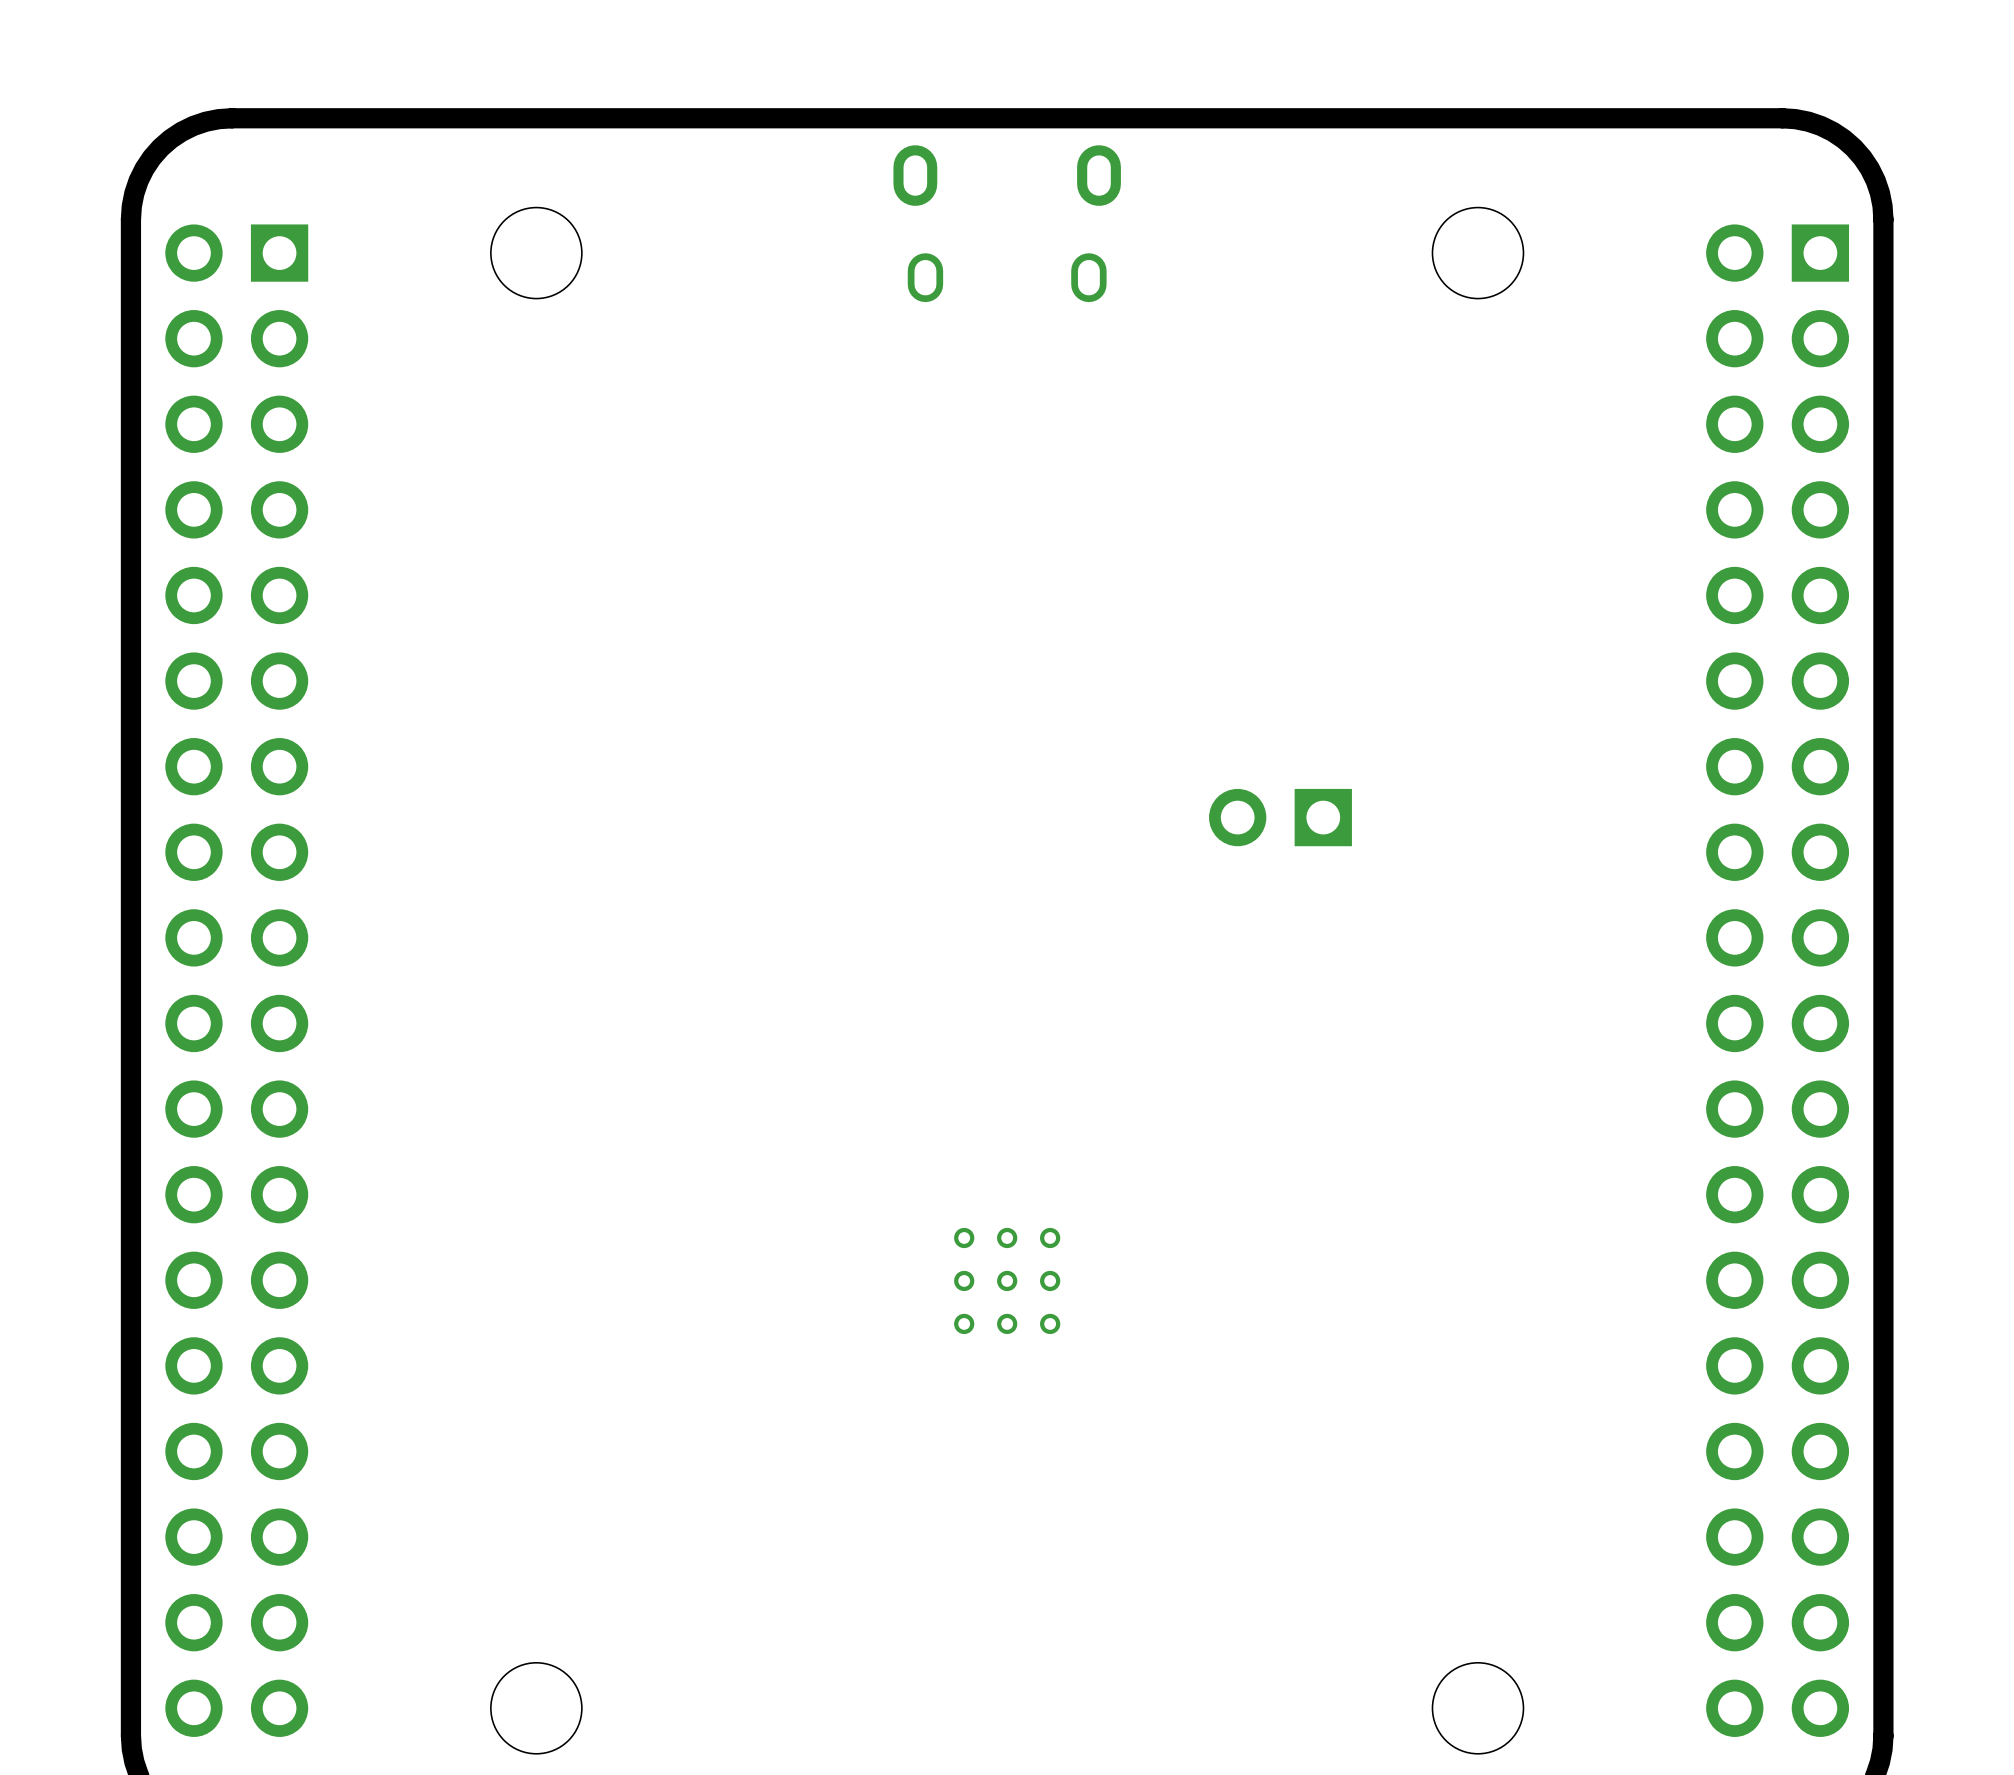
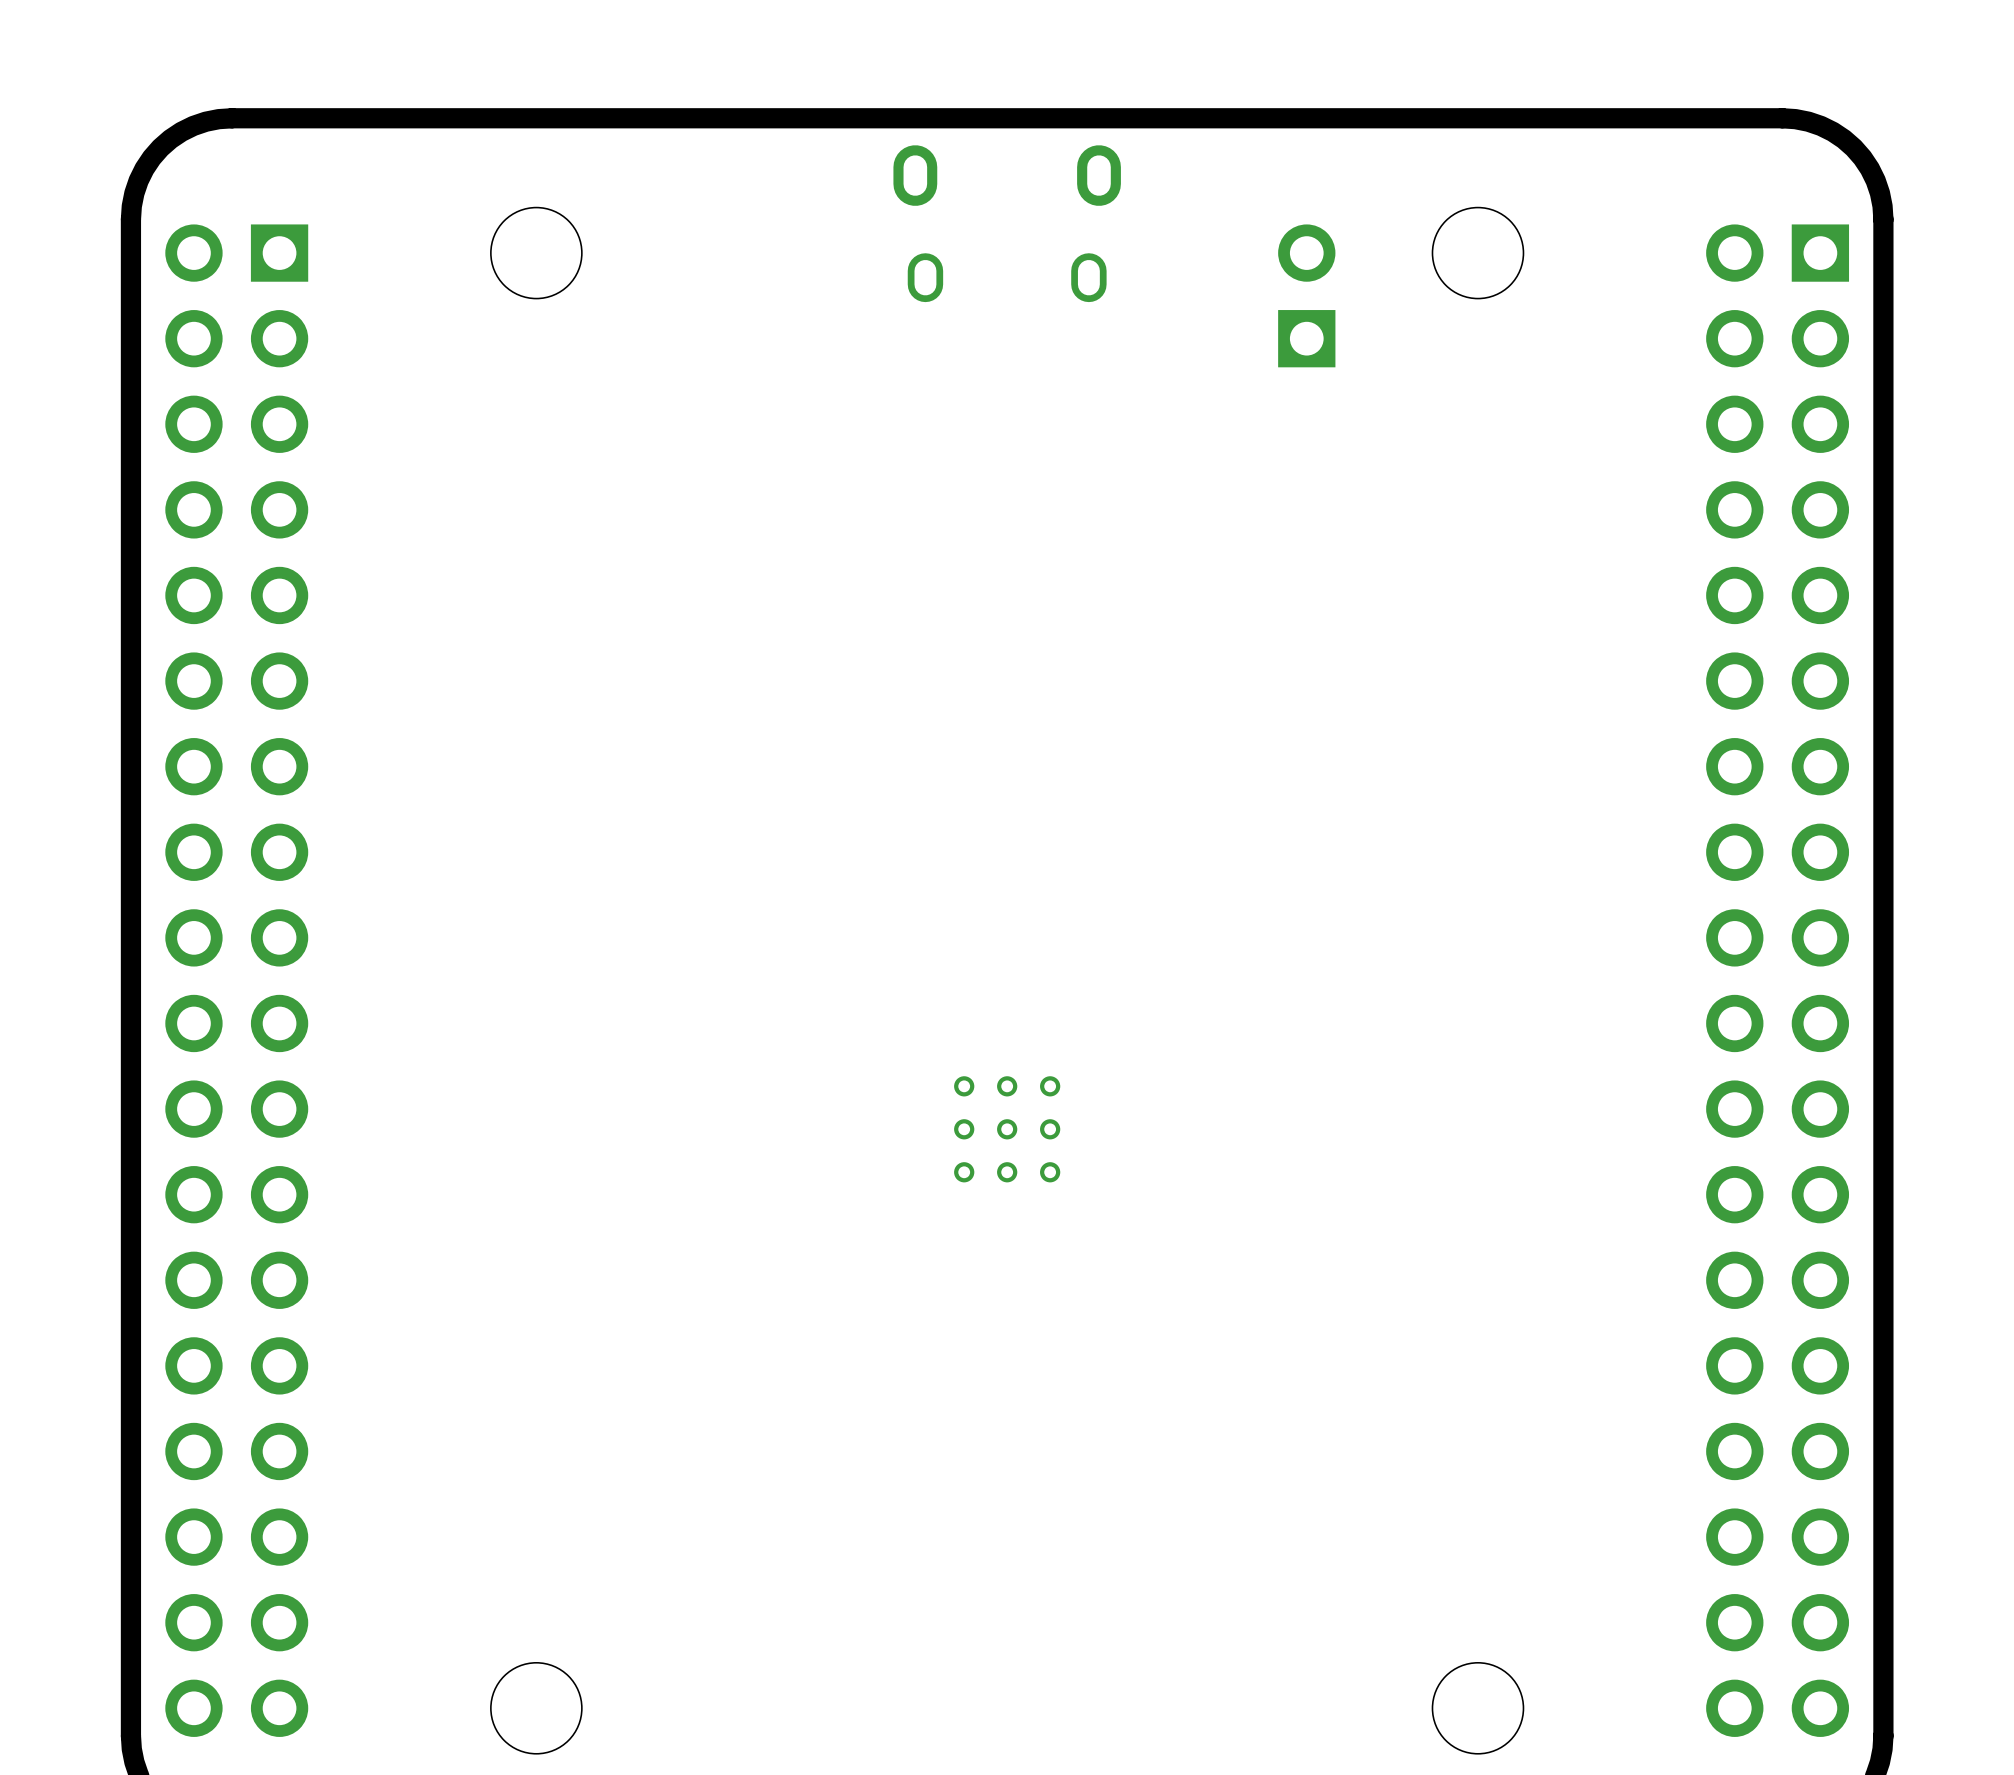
part rotation: 0° (1280, 817) -> 90° clockwise (1306, 295)
part position: (1280, 817) -> (1306, 295)
part position: (1007, 1280) -> (1007, 1129)

